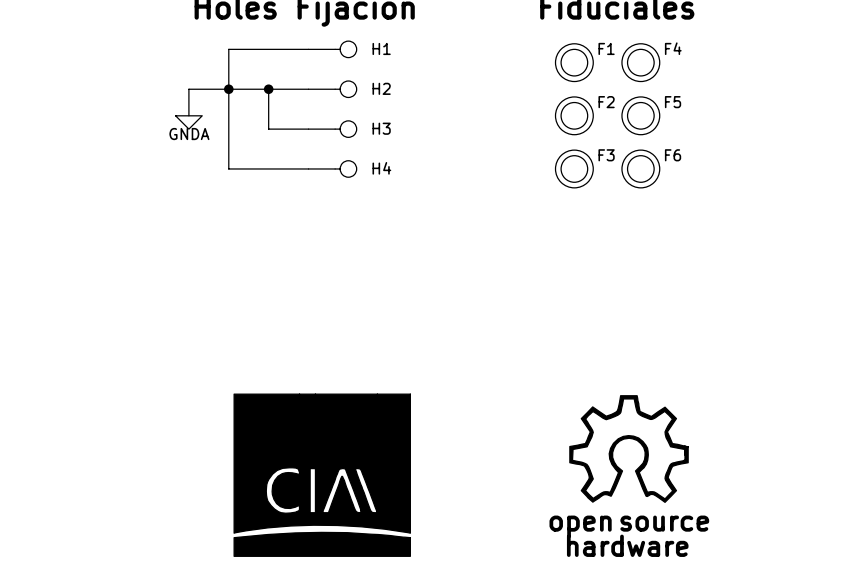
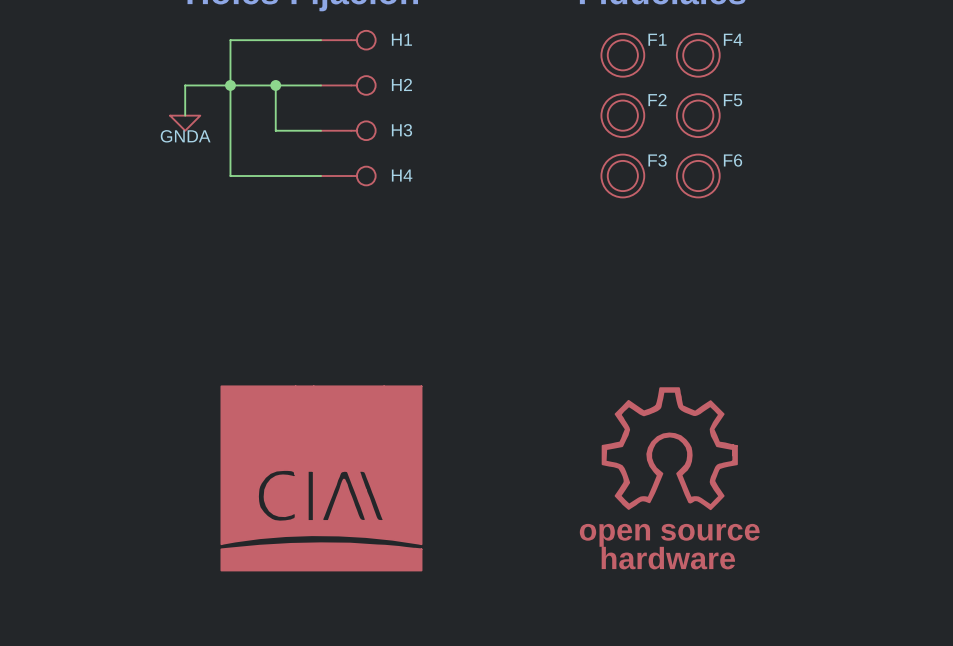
power symbol position: (629, 449) -> (669, 448)
power symbol position: (322, 475) -> (321, 478)

